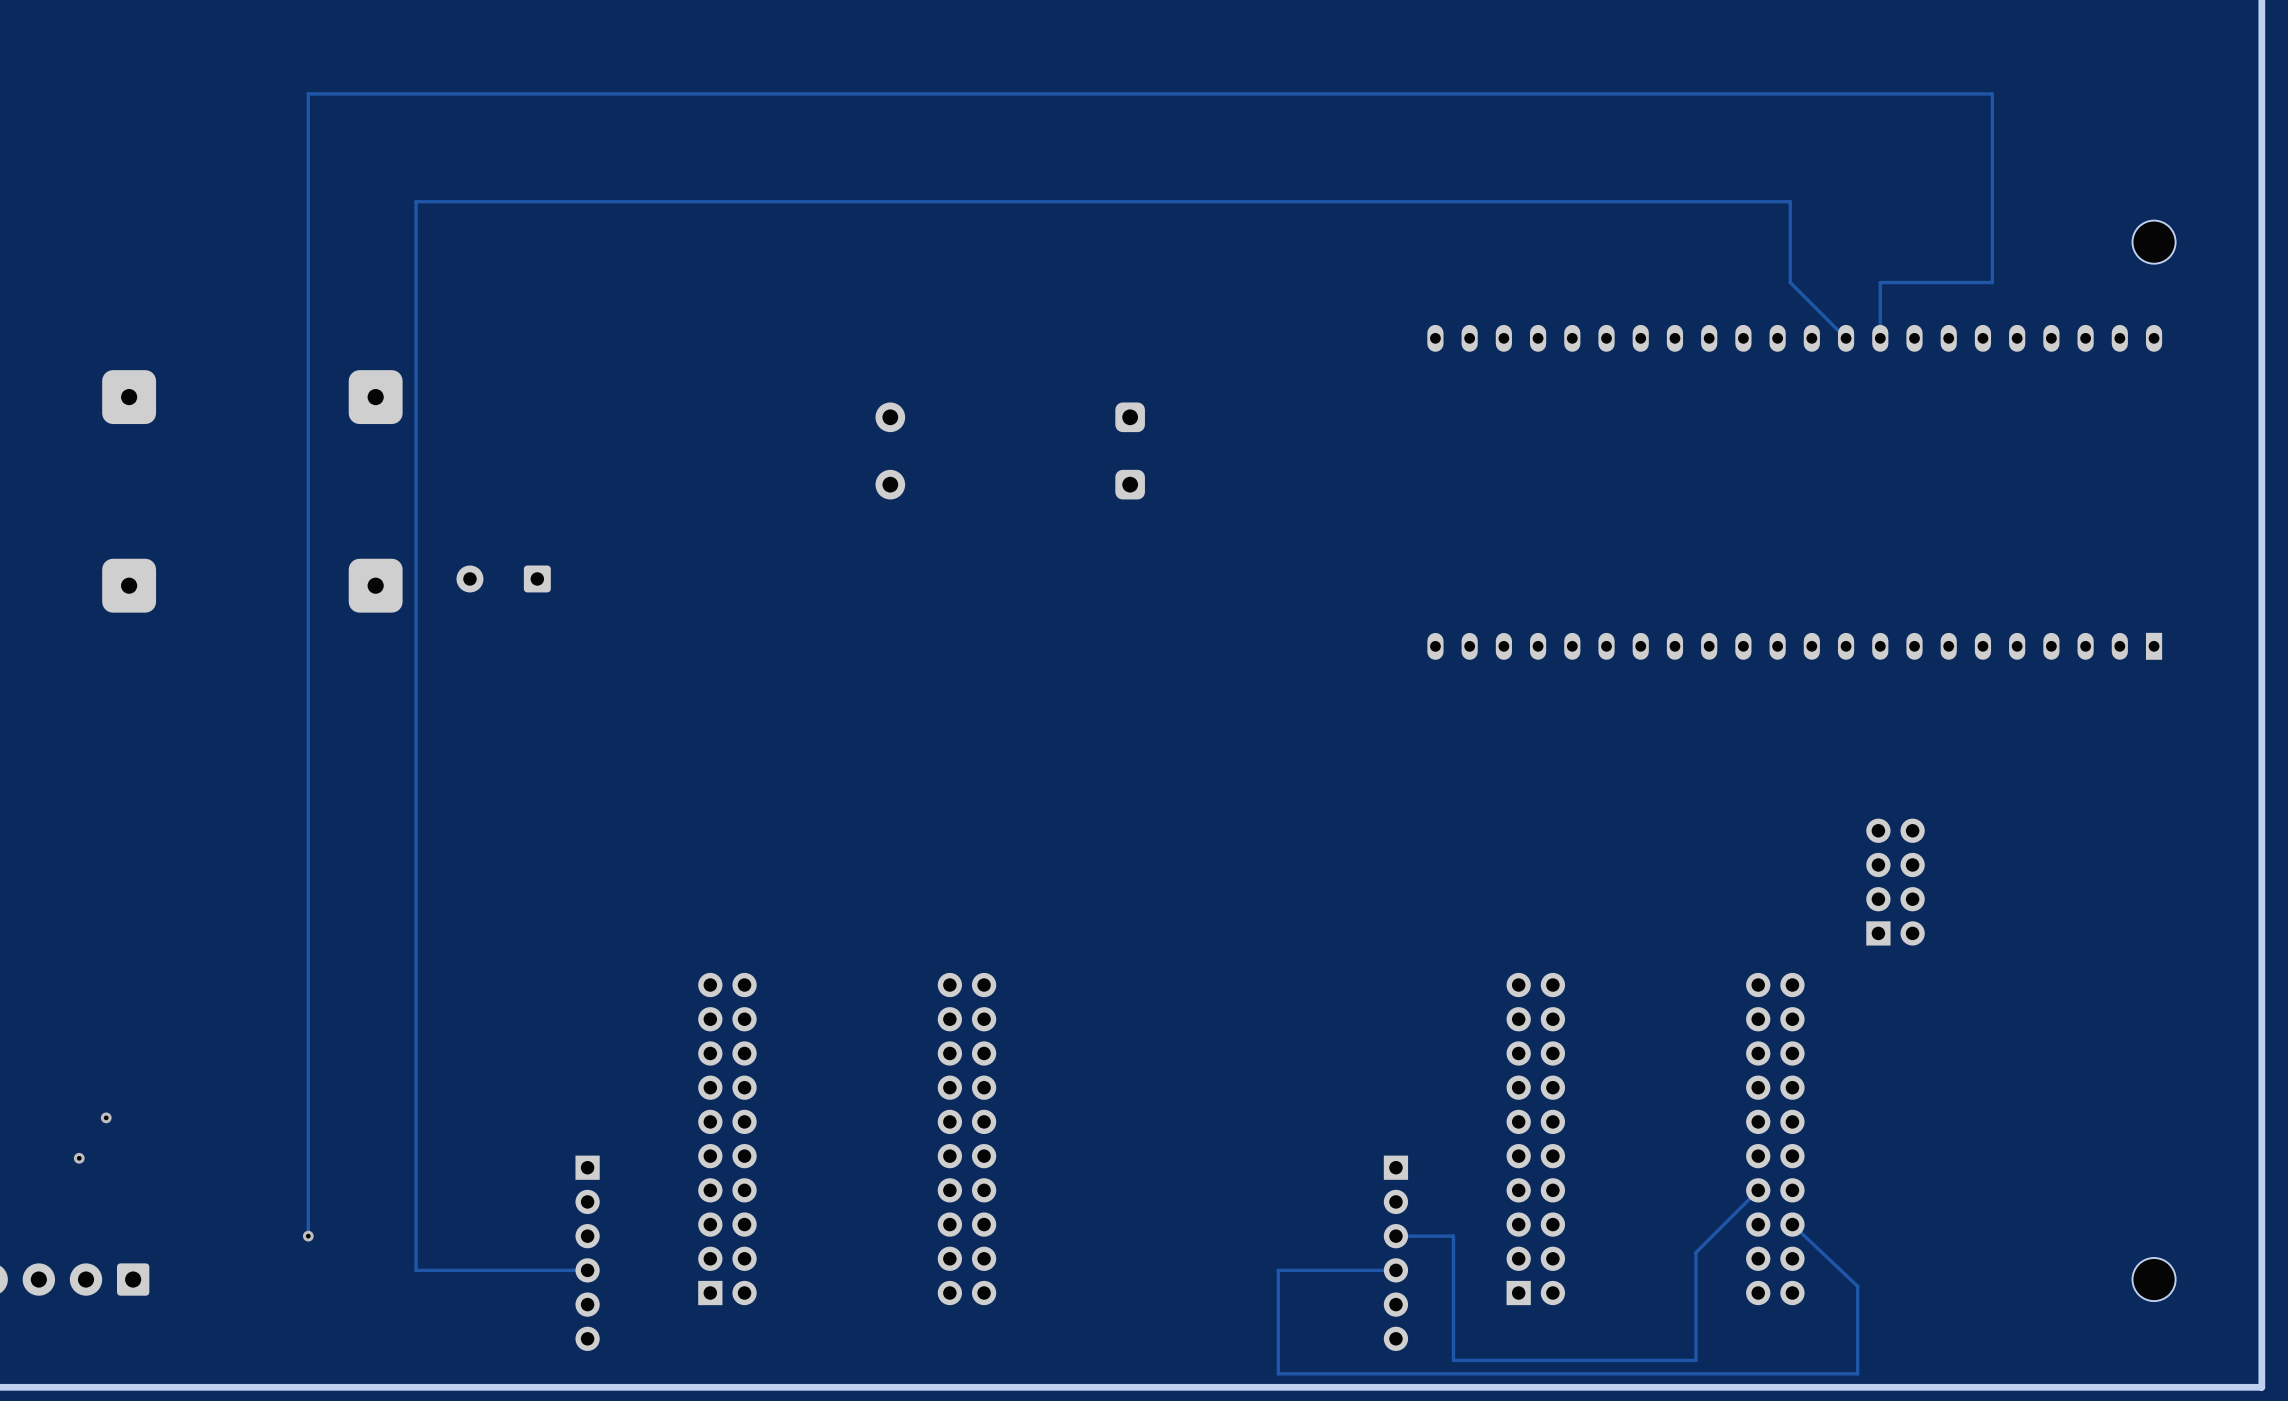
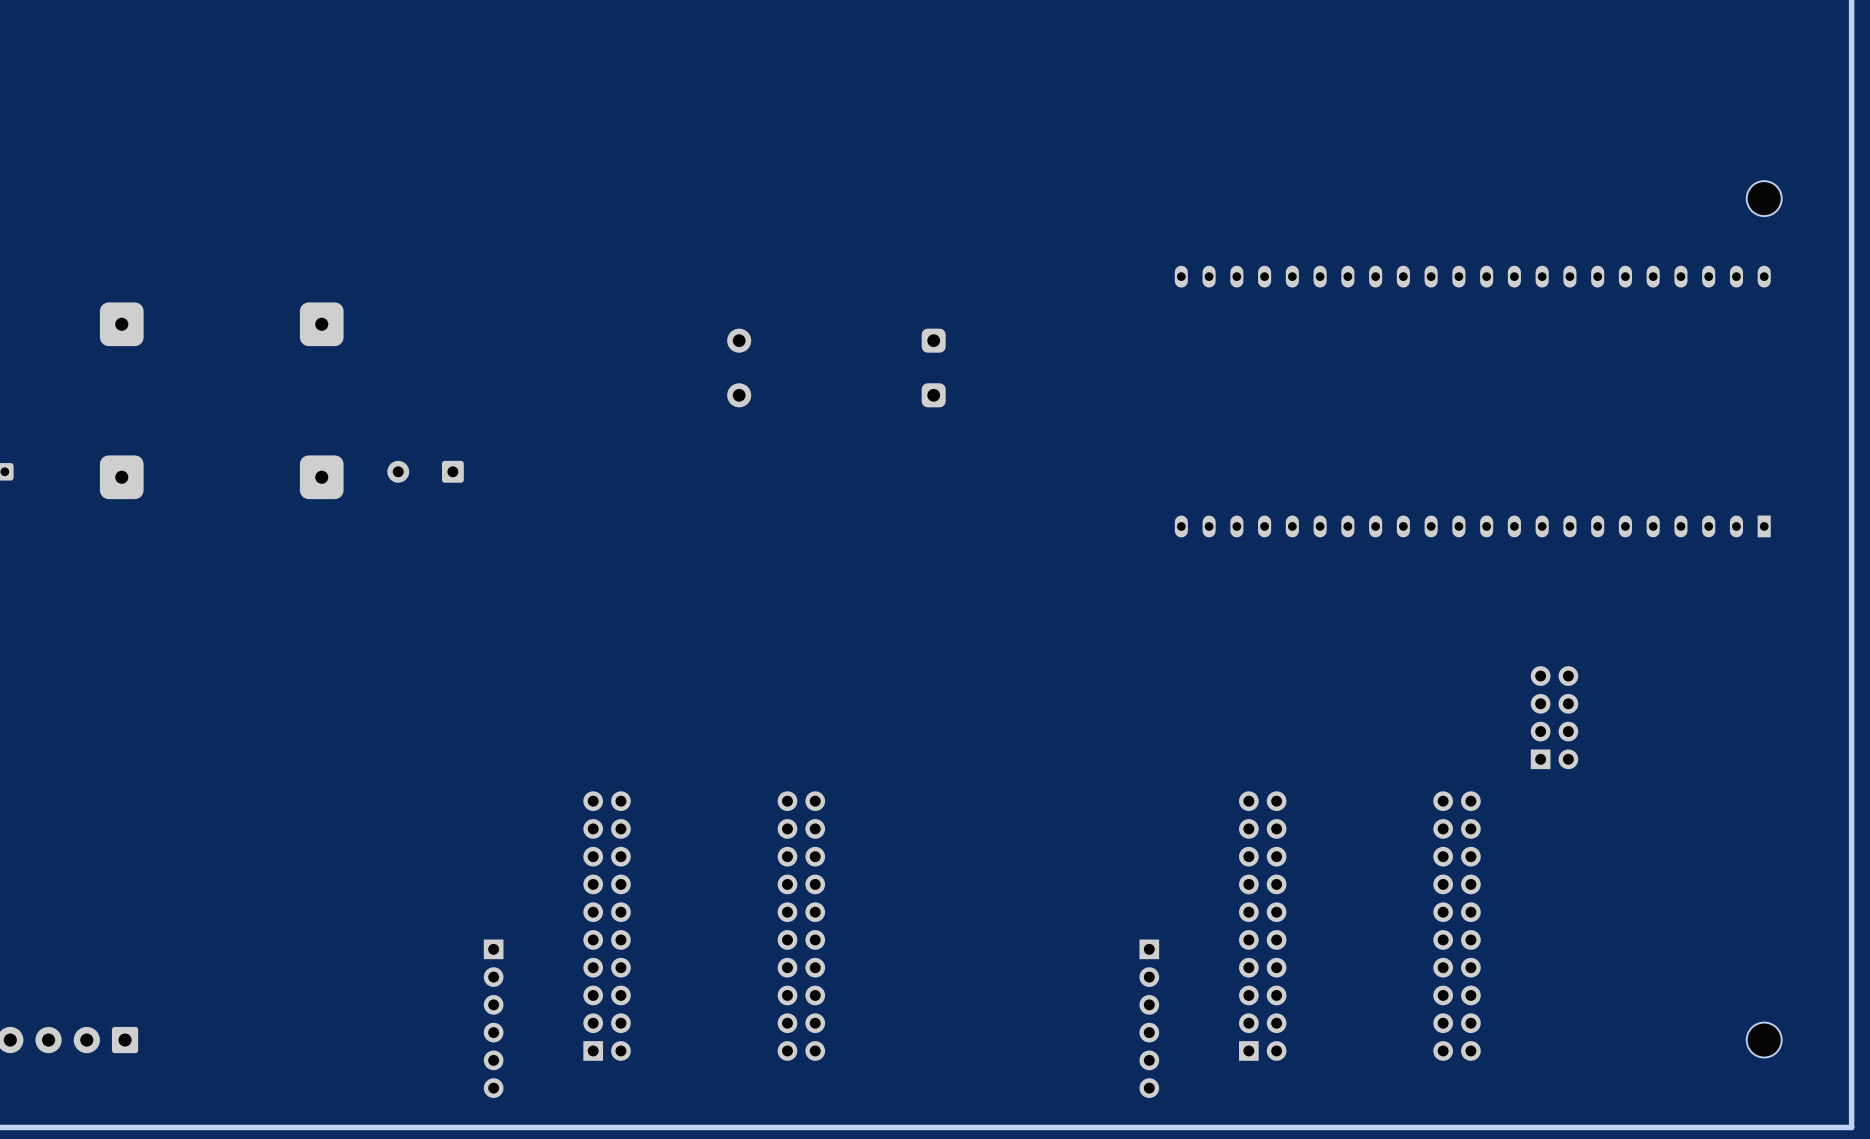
track: (1846, 338) (1790, 282) (1790, 201) (416, 201) (416, 1270) (587, 1270) -> none
track: (1880, 338) (1880, 282) (1992, 282) (1992, 93) (308, 93) (308, 1236) -> none
via: (106, 1117) -> none
via: (79, 1158) -> none
track: (1758, 1190) (1695, 1252) (1695, 1360) (1453, 1360) (1453, 1236) (1395, 1236) -> none
track: (1792, 1224) (1857, 1286) (1857, 1373) (1278, 1373) (1278, 1270) (1395, 1270) -> none
via: (308, 1236) -> none

